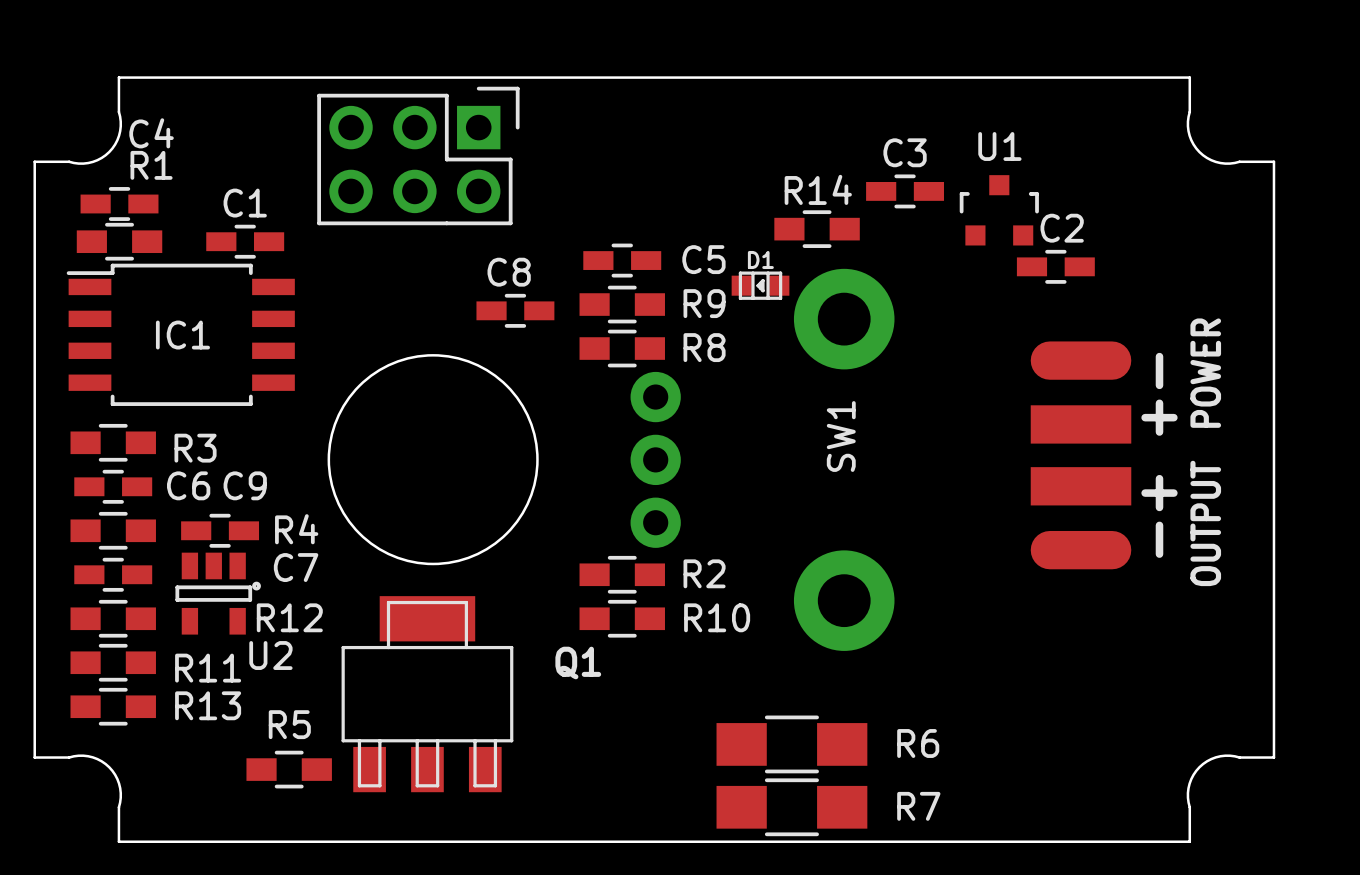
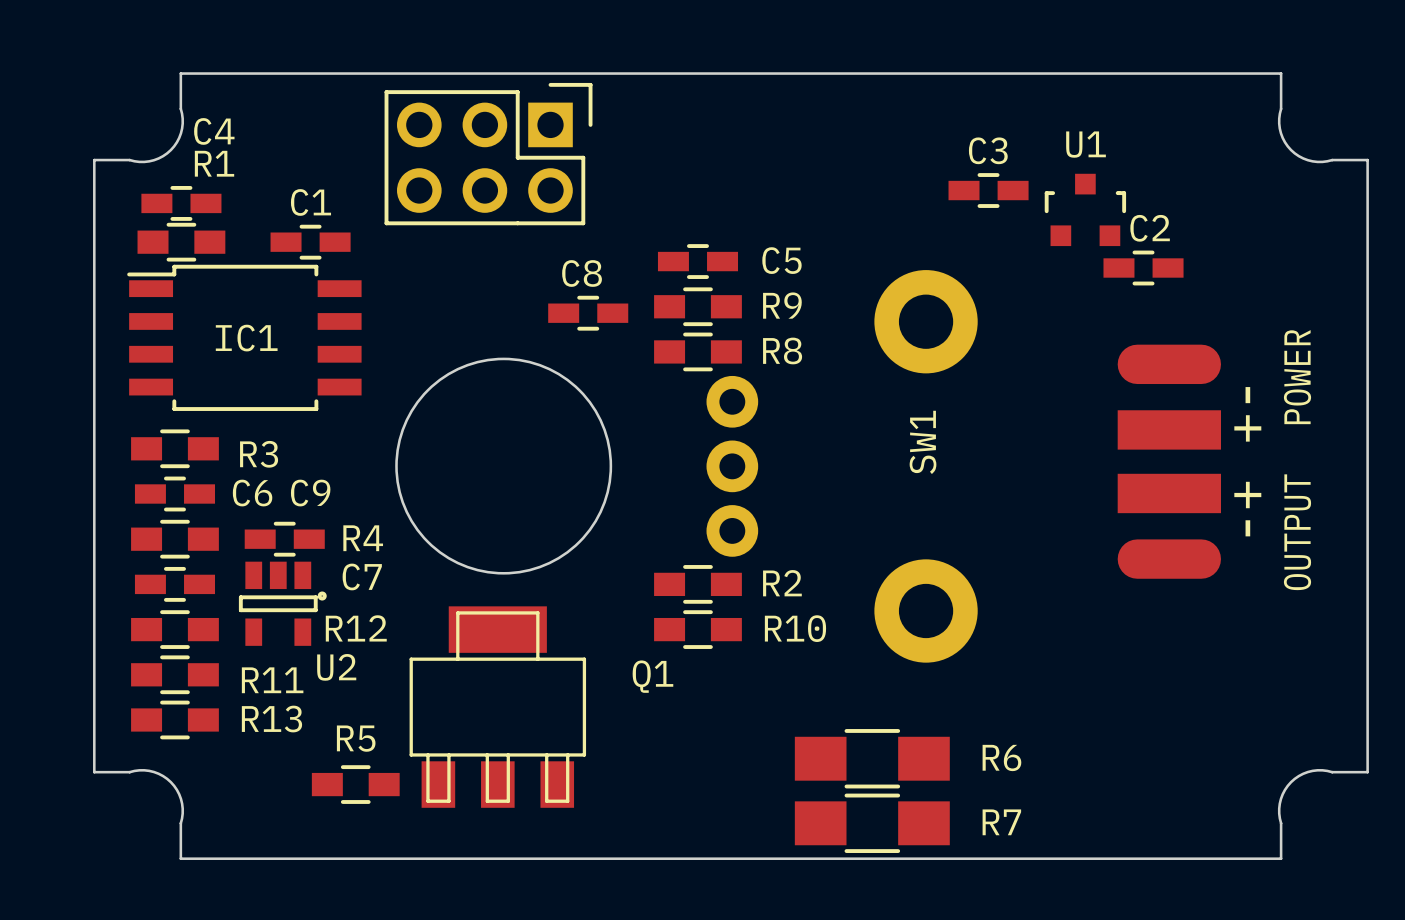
R14: (817, 229) -> none
D1: (760, 285) -> none

